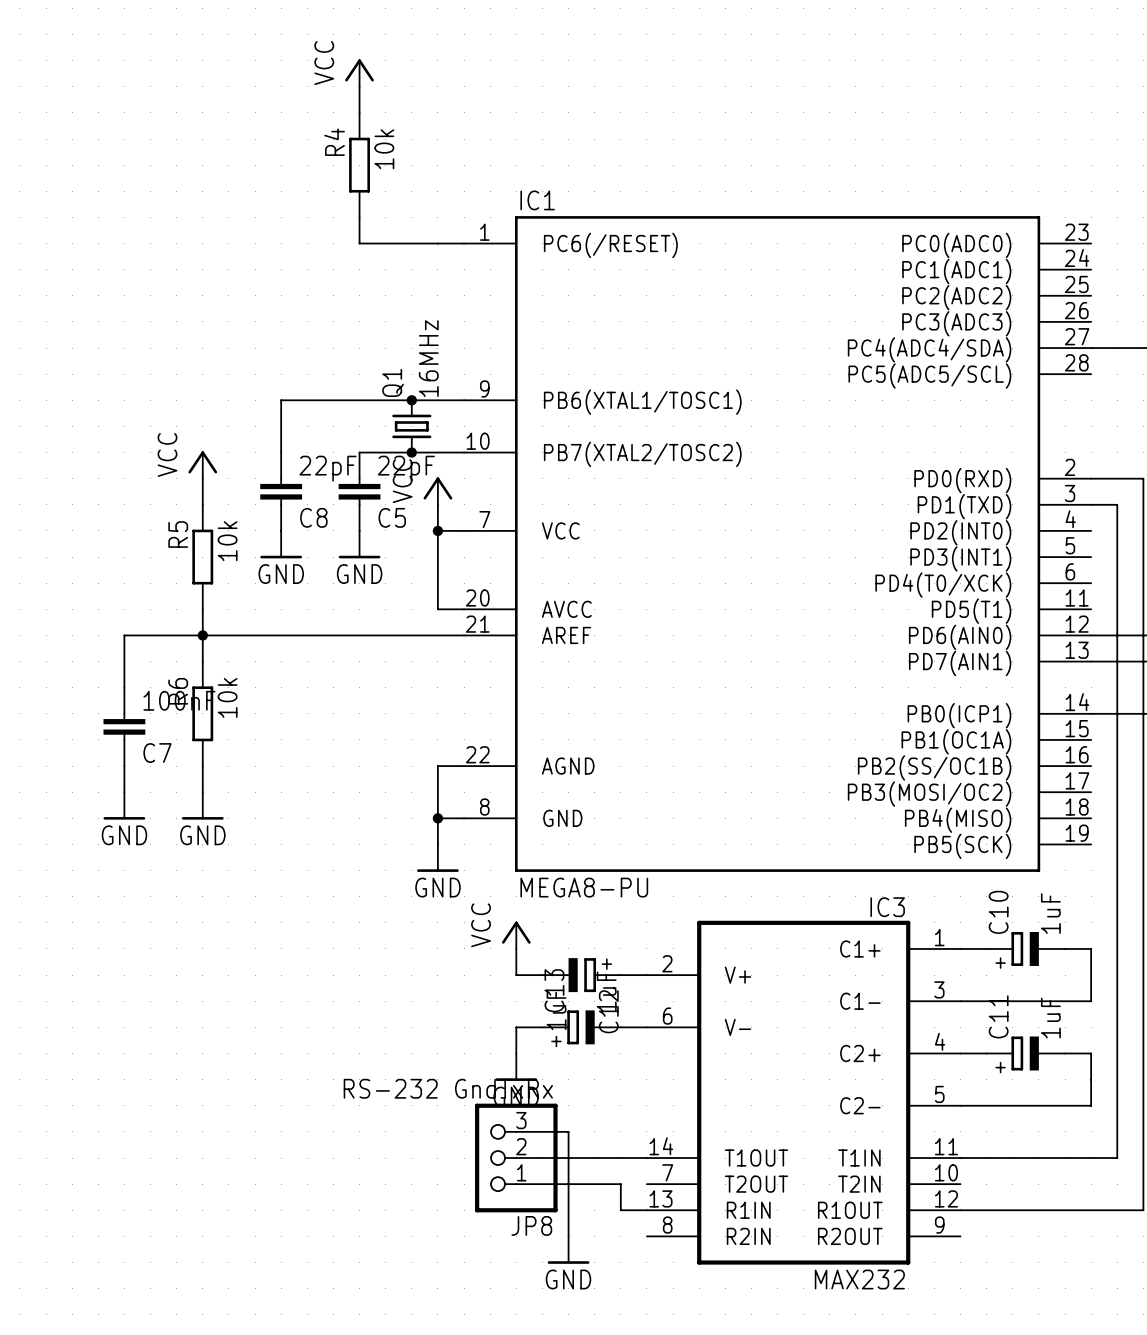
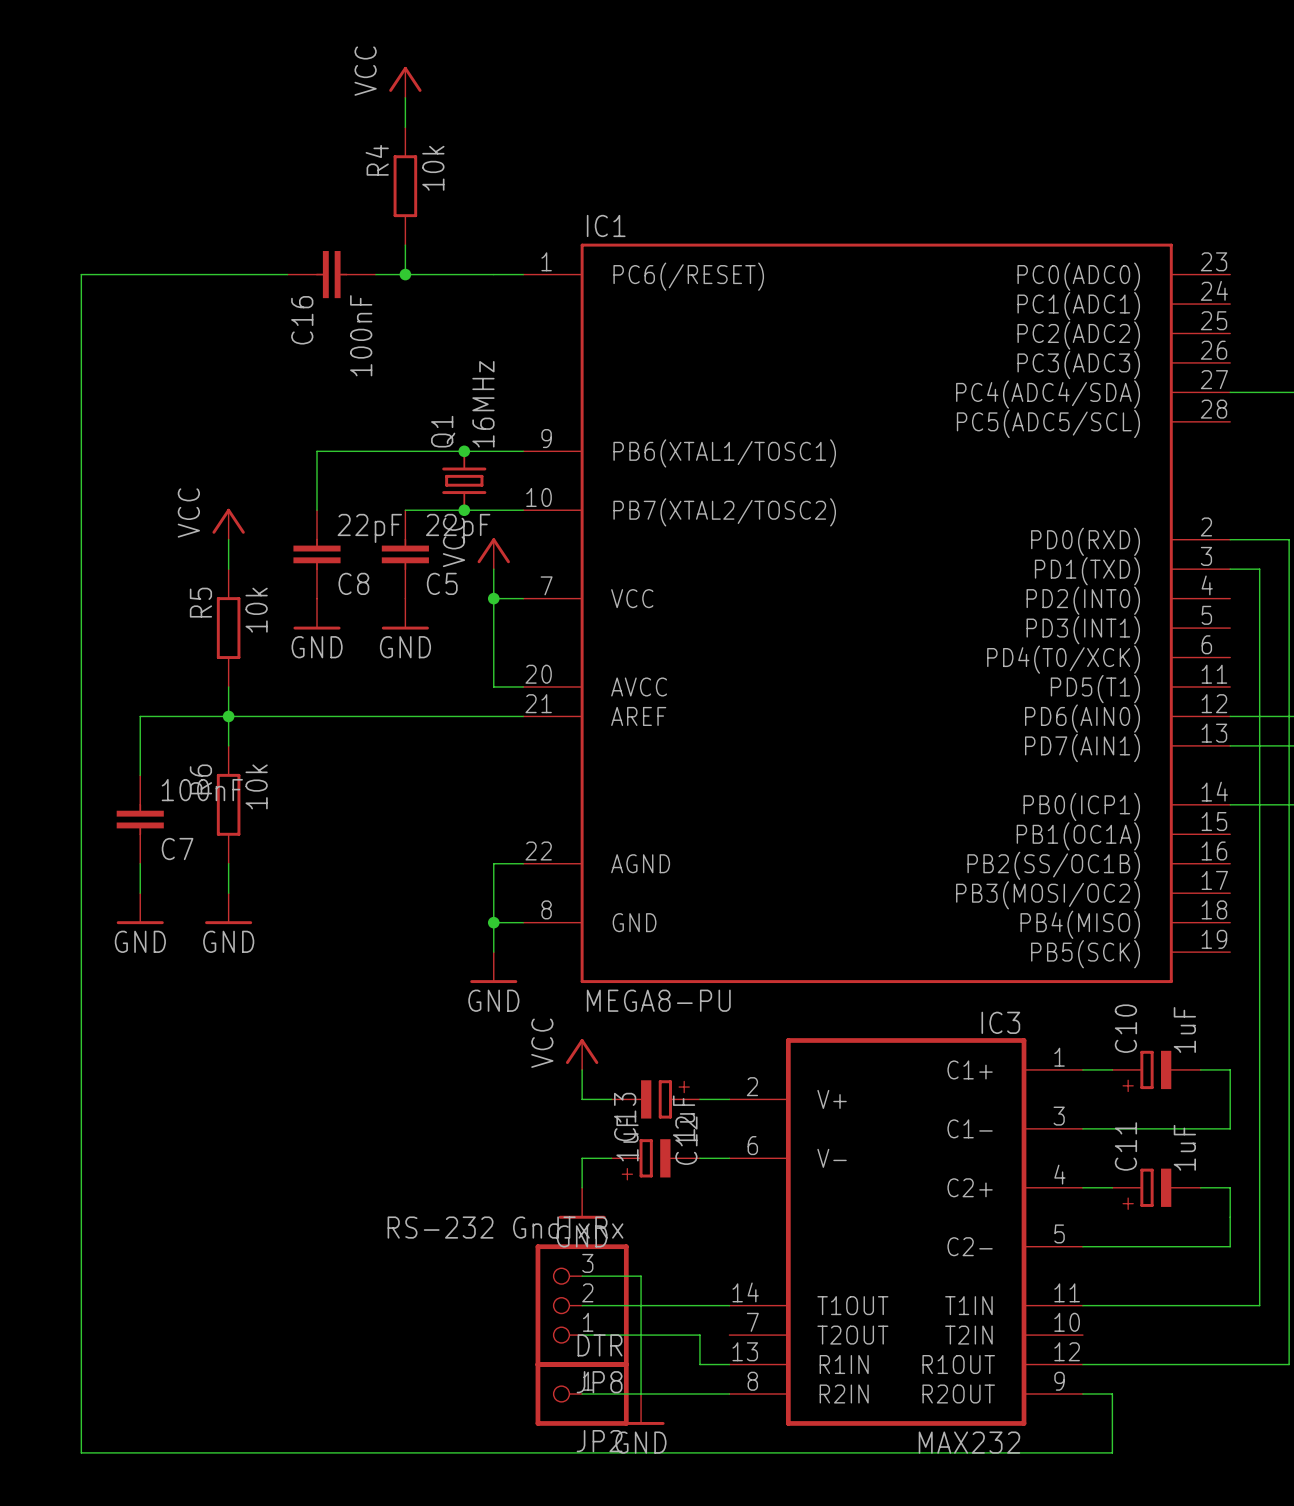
wire: none -> (287, 274) (81, 274) (81, 1452) (1112, 1452) (1112, 1394) (1082, 1394)
C16: none -> 100nF (331, 274)
wire: none -> (375, 274) (405, 274)
junction: none -> (405, 274)
wire: none -> (582, 1394) (729, 1394)
JP2: none -> DTR (582, 1394)

